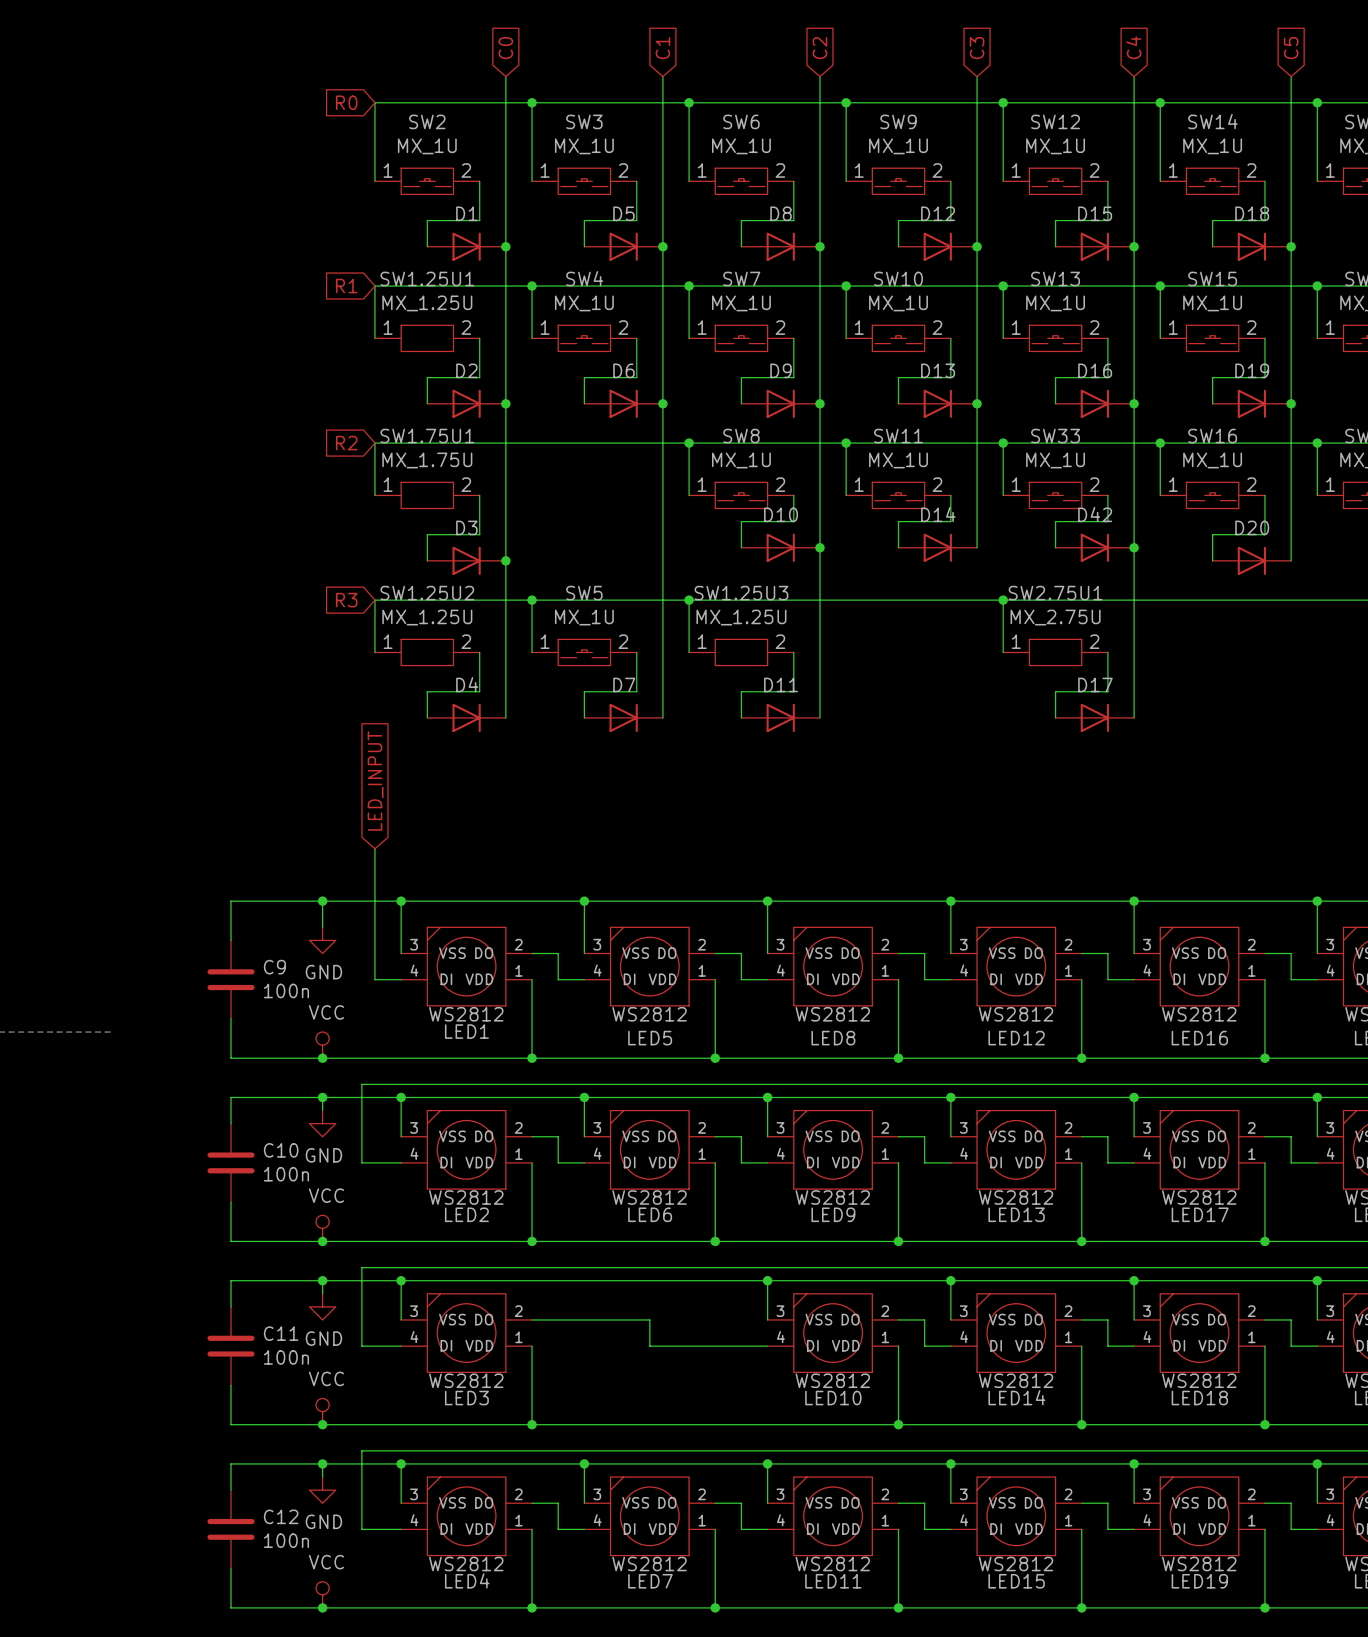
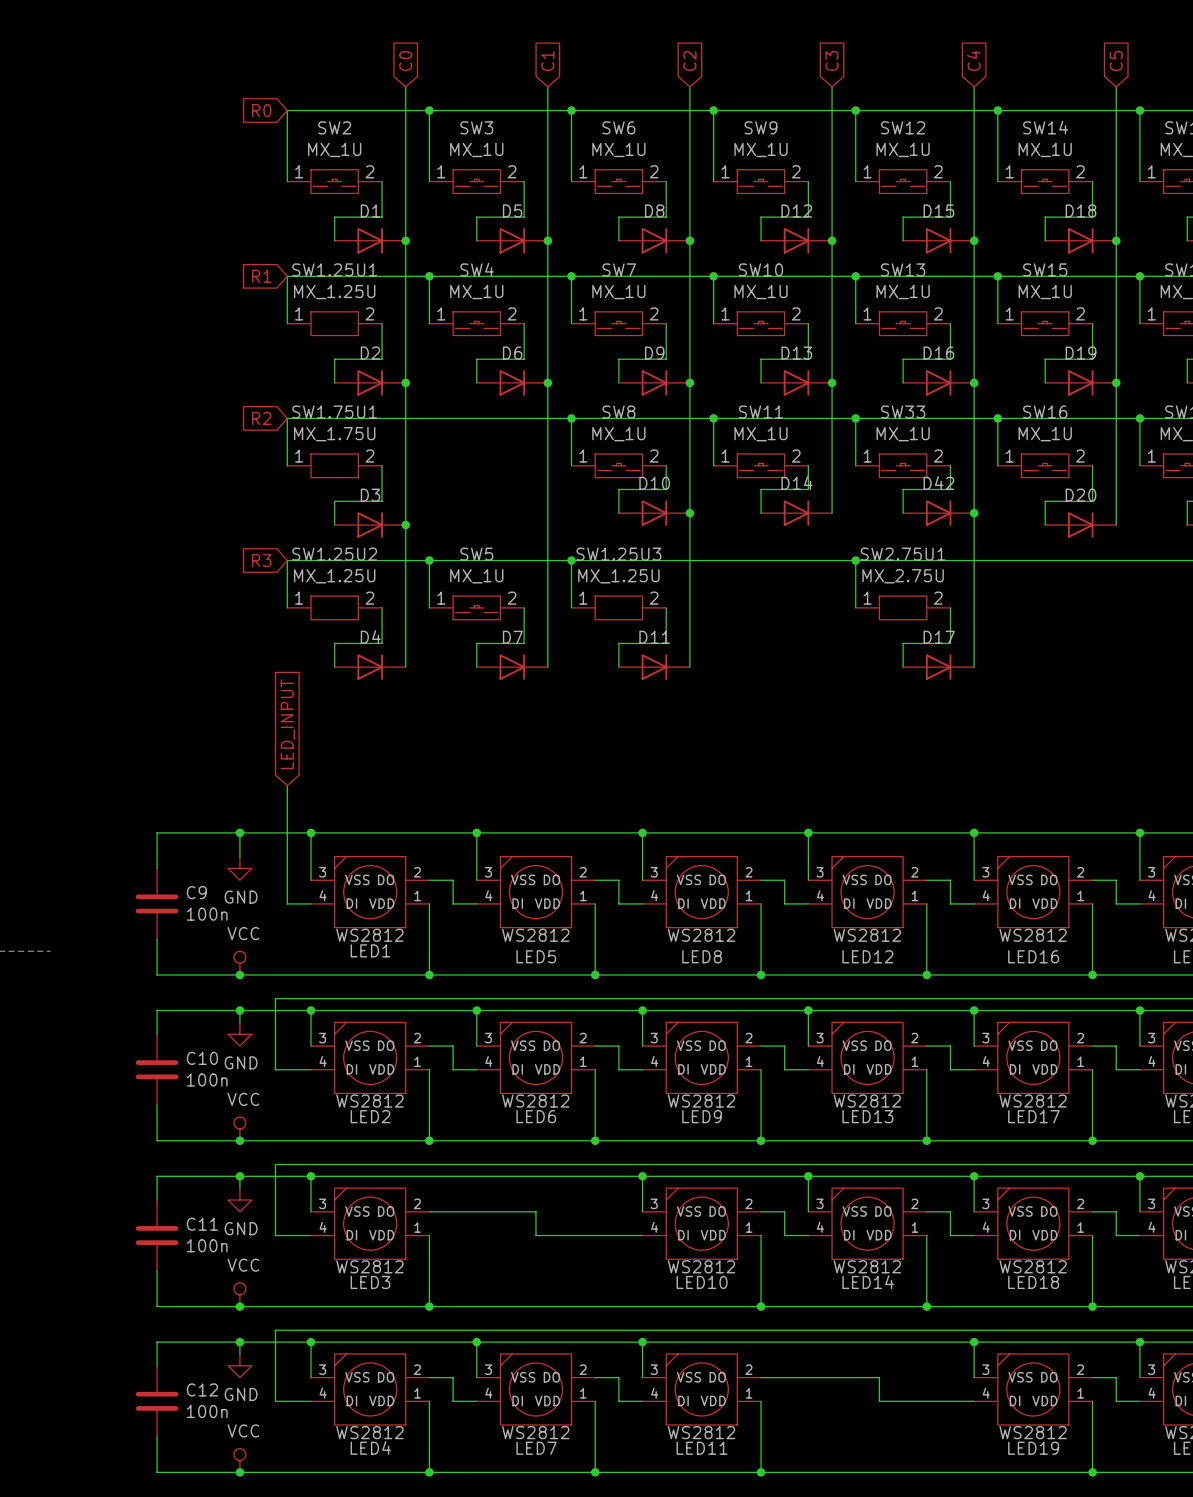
wire: (950, 1463) (950, 1503) -> none
junction: (950, 1463) -> none
wire: (924, 1503) (924, 1529) (950, 1529) -> (784, 1377) (879, 1377) (879, 1401) (950, 1401)
wire: (1081, 1503) (1107, 1503) (1107, 1529) -> none
LED15: WS2812 (1016, 1516) -> none
wire: (1081, 1529) (1081, 1607) -> none
junction: (1081, 1607) -> none

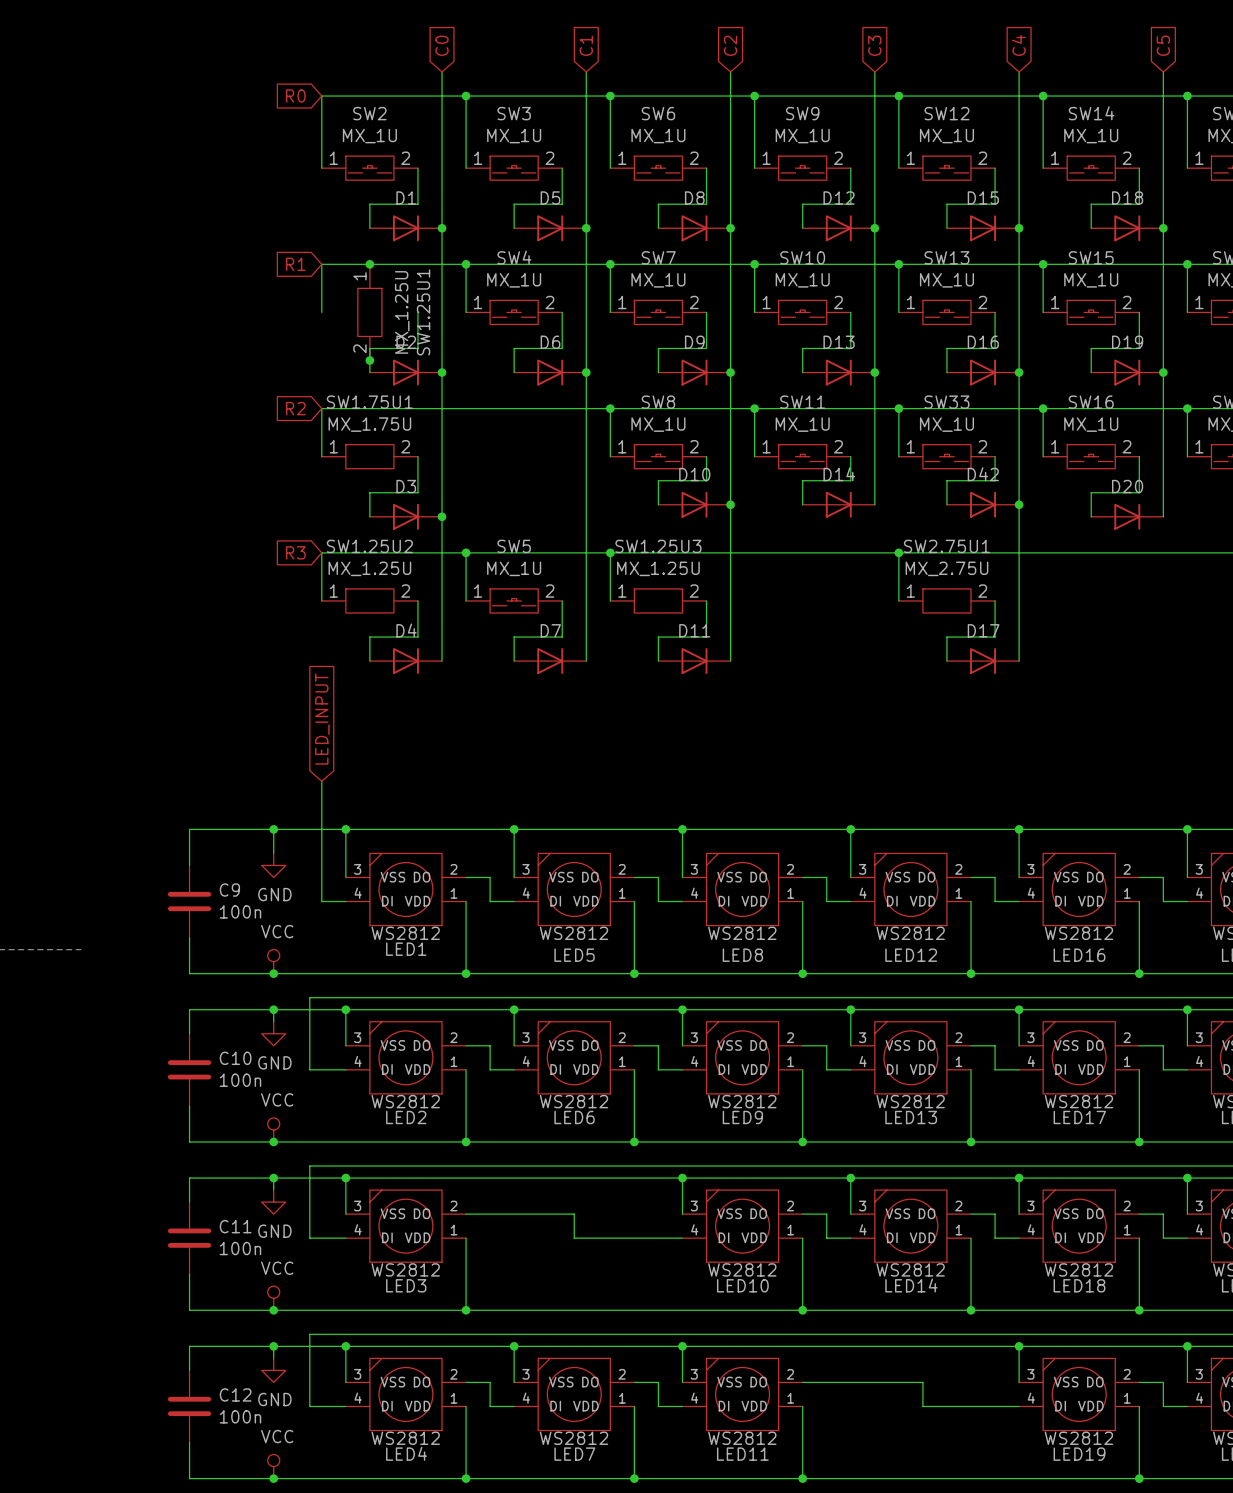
junction: none -> (369, 264)
SW1.25U1 rotation: 0° (334, 323) -> 90° clockwise (369, 312)
junction: none -> (369, 360)

